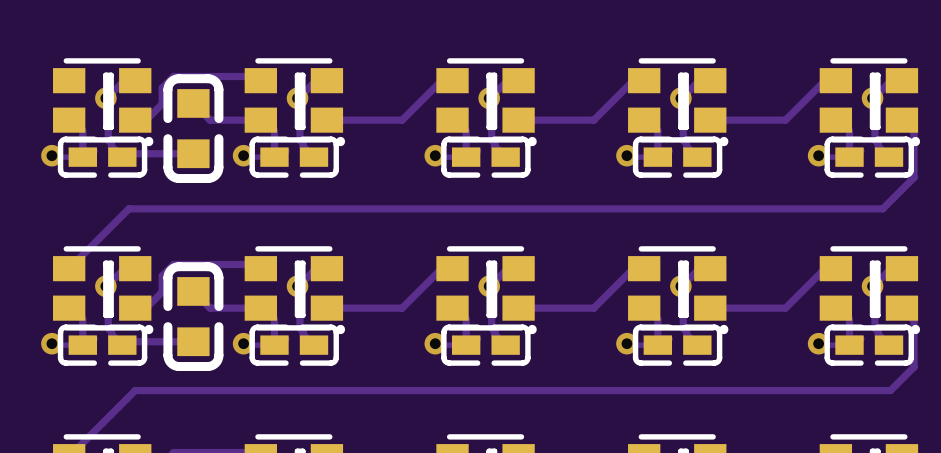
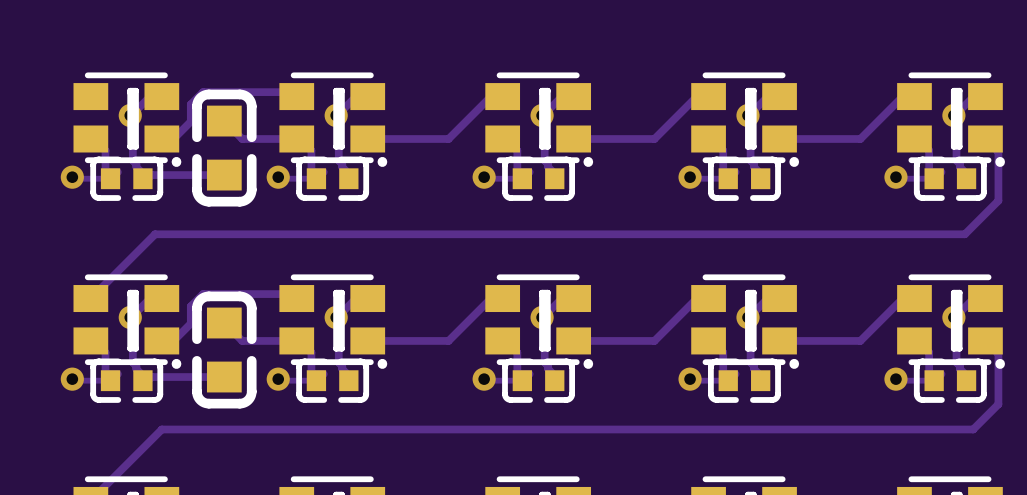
part footprint: [57, 136, 148, 178] -> [90, 156, 164, 201]
part footprint: [249, 136, 339, 178] -> [296, 156, 370, 201]
part footprint: [441, 136, 531, 178] -> [502, 156, 576, 201]
part footprint: [632, 136, 723, 178] -> [708, 156, 781, 201]
part footprint: [824, 136, 914, 178] -> [913, 156, 987, 201]
part footprint: [57, 324, 148, 366] -> [90, 358, 164, 403]
part footprint: [249, 324, 339, 366] -> [296, 358, 370, 403]
part footprint: [441, 324, 531, 366] -> [502, 358, 576, 403]
part footprint: [632, 324, 723, 366] -> [708, 358, 781, 403]
part footprint: [824, 324, 914, 366] -> [913, 358, 987, 403]

